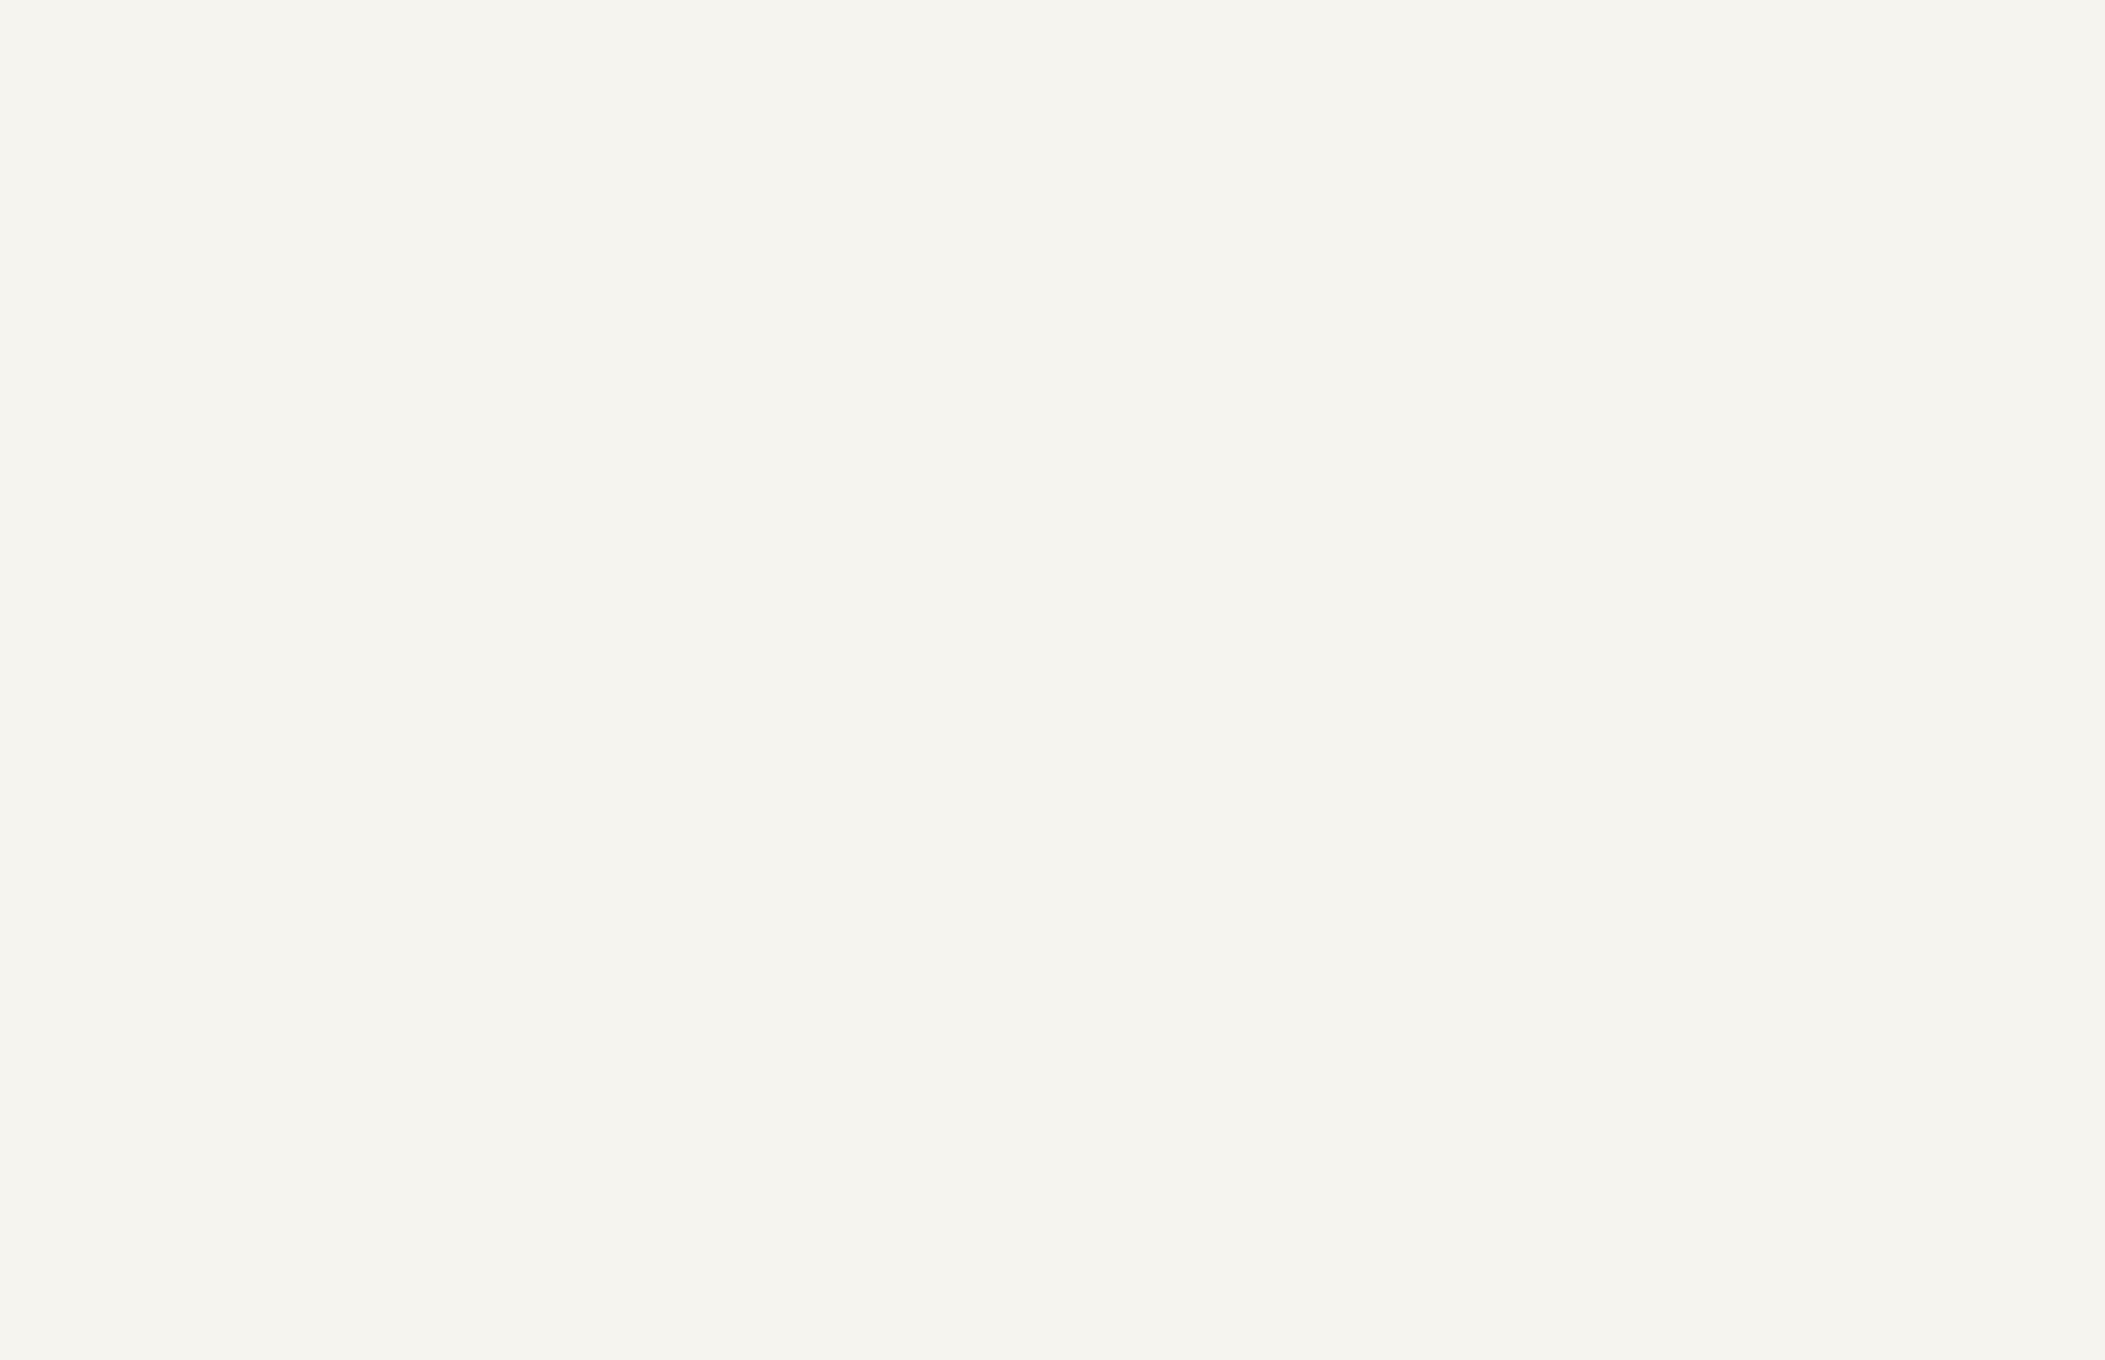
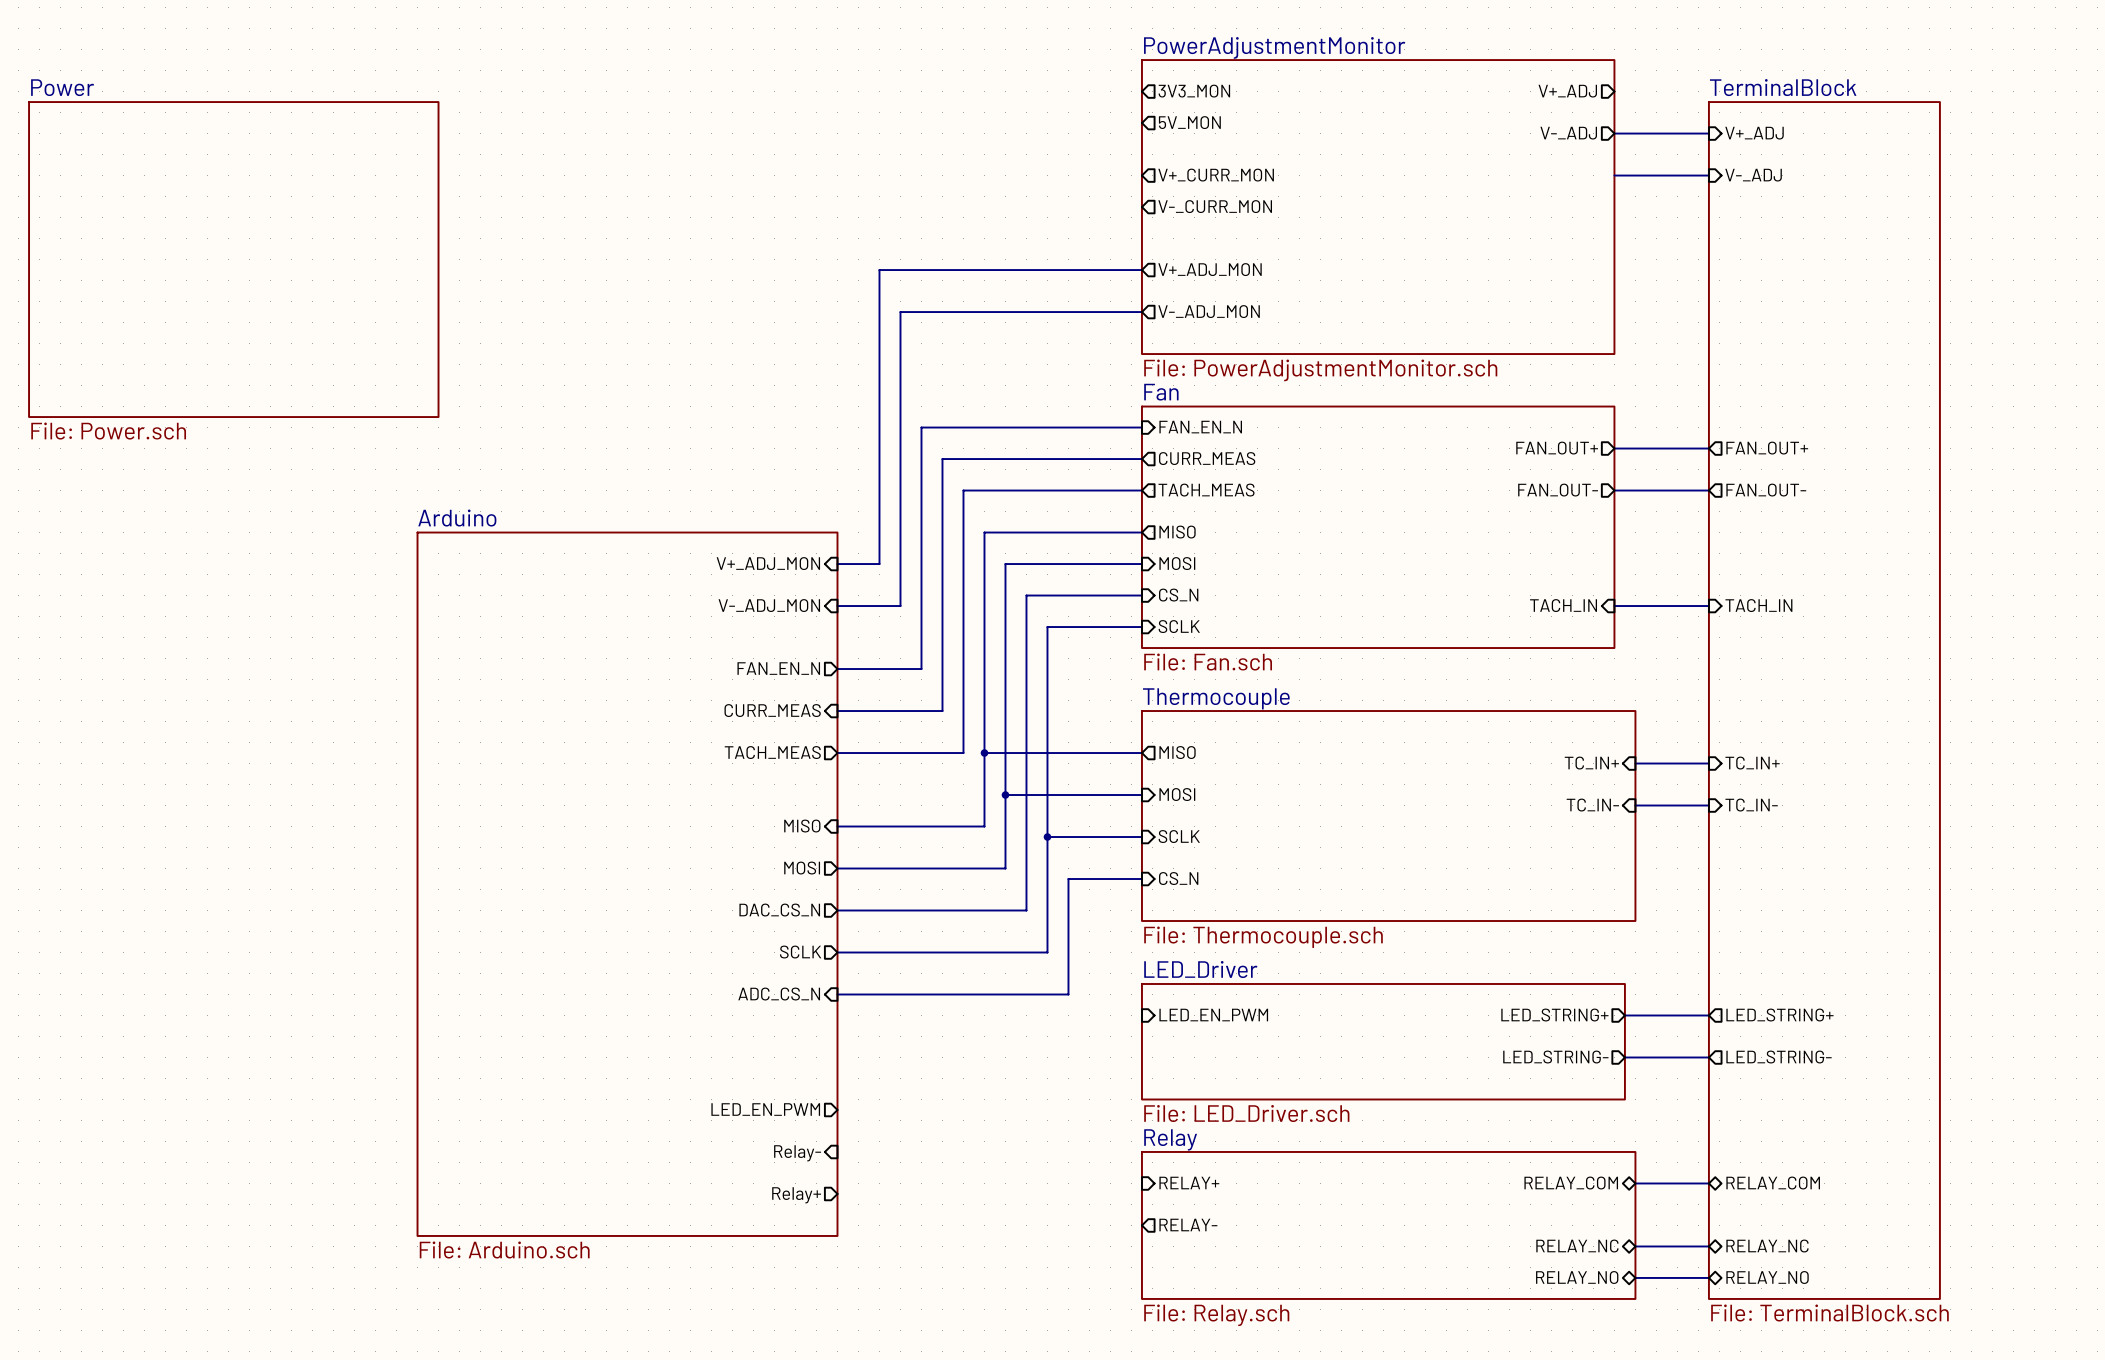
sheet pin: none -> 3V3_MON (1194, 91)
sheet pin: none -> V+_ADJ (1567, 91)
sheet pin: none -> 5V_MON (1189, 122)
wire: none -> (1614, 133) (1708, 133)
sheet pin: none -> V-_ADJ (1568, 133)
sheet pin: none -> V+_ADJ (1754, 133)
wire: none -> (1614, 175) (1708, 175)
sheet pin: none -> V+_CURR_MON (1216, 175)
sheet pin: none -> V-_ADJ (1753, 175)
sheet PowerAdjustmentMonitor: none -> File: PowerAdjustmentMonitor.sch (1378, 207)
sheet pin: none -> V-_CURR_MON (1215, 206)
sheet Power: none -> File: Power.sch (233, 259)
wire: none -> (1141, 270) (879, 270) (879, 564) (837, 564)
sheet pin: none -> V+_ADJ_MON (1210, 269)
wire: none -> (1141, 312) (900, 312) (900, 606) (837, 606)
sheet pin: none -> V-_ADJ_MON (1209, 311)
wire: none -> (1141, 427) (921, 427) (921, 669) (837, 669)
sheet pin: none -> FAN_EN_N (1200, 427)
wire: none -> (1614, 448) (1708, 448)
sheet pin: none -> FAN_OUT+ (1557, 448)
sheet pin: none -> FAN_OUT+ (1767, 448)
wire: none -> (1141, 459) (942, 459) (942, 711) (837, 711)
sheet pin: none -> CURR_MEAS (1207, 458)
wire: none -> (1141, 490) (963, 490) (963, 753) (837, 753)
wire: none -> (1614, 490) (1708, 490)
sheet pin: none -> TACH_MEAS (1206, 490)
sheet pin: none -> FAN_OUT- (1558, 490)
sheet pin: none -> FAN_OUT- (1766, 490)
sheet Fan: none -> File: Fan.sch (1378, 527)
wire: none -> (1141, 532) (984, 532) (984, 826) (837, 826)
sheet pin: none -> MISO (1177, 532)
sheet pin: none -> MOSI (1177, 563)
wire: none -> (1141, 564) (1005, 564) (1005, 868) (837, 868)
sheet pin: none -> V+_ADJ_MON (768, 563)
wire: none -> (1141, 595) (1026, 595) (1026, 910) (837, 910)
sheet pin: none -> CS_N (1178, 595)
wire: none -> (1614, 606) (1708, 606)
sheet pin: none -> V-_ADJ_MON (769, 605)
sheet pin: none -> TACH_IN (1563, 605)
sheet pin: none -> TACH_IN (1758, 605)
sheet pin: none -> SCLK (1179, 626)
wire: none -> (1141, 627) (1047, 627) (1047, 952) (837, 952)
sheet pin: none -> FAN_EN_N (778, 668)
sheet TerminalBlock: none -> File: TerminalBlock.sch (1824, 700)
sheet pin: none -> CURR_MEAS (772, 710)
sheet pin: none -> MISO (1177, 752)
wire: none -> (984, 753) (1141, 753)
junction: none -> (984, 753)
sheet pin: none -> TACH_MEAS (772, 752)
wire: none -> (1635, 763) (1708, 763)
sheet pin: none -> TC_IN+ (1591, 763)
sheet pin: none -> TC_IN+ (1752, 763)
sheet pin: none -> MOSI (1177, 794)
wire: none -> (1005, 795) (1141, 795)
junction: none -> (1005, 795)
wire: none -> (1635, 805) (1708, 805)
sheet pin: none -> TC_IN- (1592, 805)
sheet pin: none -> TC_IN- (1751, 805)
sheet Thermocouple: none -> File: Thermocouple.sch (1388, 816)
sheet pin: none -> MISO (802, 826)
sheet pin: none -> SCLK (1179, 836)
wire: none -> (1047, 837) (1141, 837)
junction: none -> (1047, 837)
sheet pin: none -> MOSI (802, 868)
wire: none -> (1141, 879) (1068, 879) (1068, 994) (837, 994)
sheet pin: none -> CS_N (1178, 878)
sheet Arduino: none -> File: Arduino.sch (627, 884)
sheet pin: none -> DAC_CS_N (779, 910)
sheet pin: none -> SCLK (800, 952)
sheet pin: none -> ADC_CS_N (779, 994)
wire: none -> (1624, 1015) (1708, 1015)
sheet pin: none -> LED_EN_PWM (1213, 1015)
sheet pin: none -> LED_STRING+ (1554, 1015)
sheet pin: none -> LED_STRING+ (1779, 1015)
sheet LED_Driver: none -> File: LED_Driver.sch (1383, 1041)
wire: none -> (1624, 1057) (1708, 1057)
sheet pin: none -> LED_STRING- (1555, 1057)
sheet pin: none -> LED_STRING- (1779, 1057)
sheet pin: none -> LED_EN_PWM (765, 1109)
sheet pin: none -> Relay- (797, 1153)
sheet pin: none -> RELAY+ (1189, 1183)
wire: none -> (1635, 1183) (1708, 1183)
sheet pin: none -> RELAY_COM (1571, 1183)
sheet pin: none -> RELAY_COM (1773, 1183)
sheet pin: none -> Relay+ (796, 1195)
sheet pin: none -> RELAY- (1188, 1225)
sheet Relay: none -> File: Relay.sch (1388, 1225)
wire: none -> (1635, 1246) (1708, 1246)
sheet pin: none -> RELAY_NC (1577, 1246)
sheet pin: none -> RELAY_NC (1767, 1246)
wire: none -> (1635, 1277) (1708, 1277)
sheet pin: none -> RELAY_NO (1577, 1277)
sheet pin: none -> RELAY_NO (1767, 1277)

